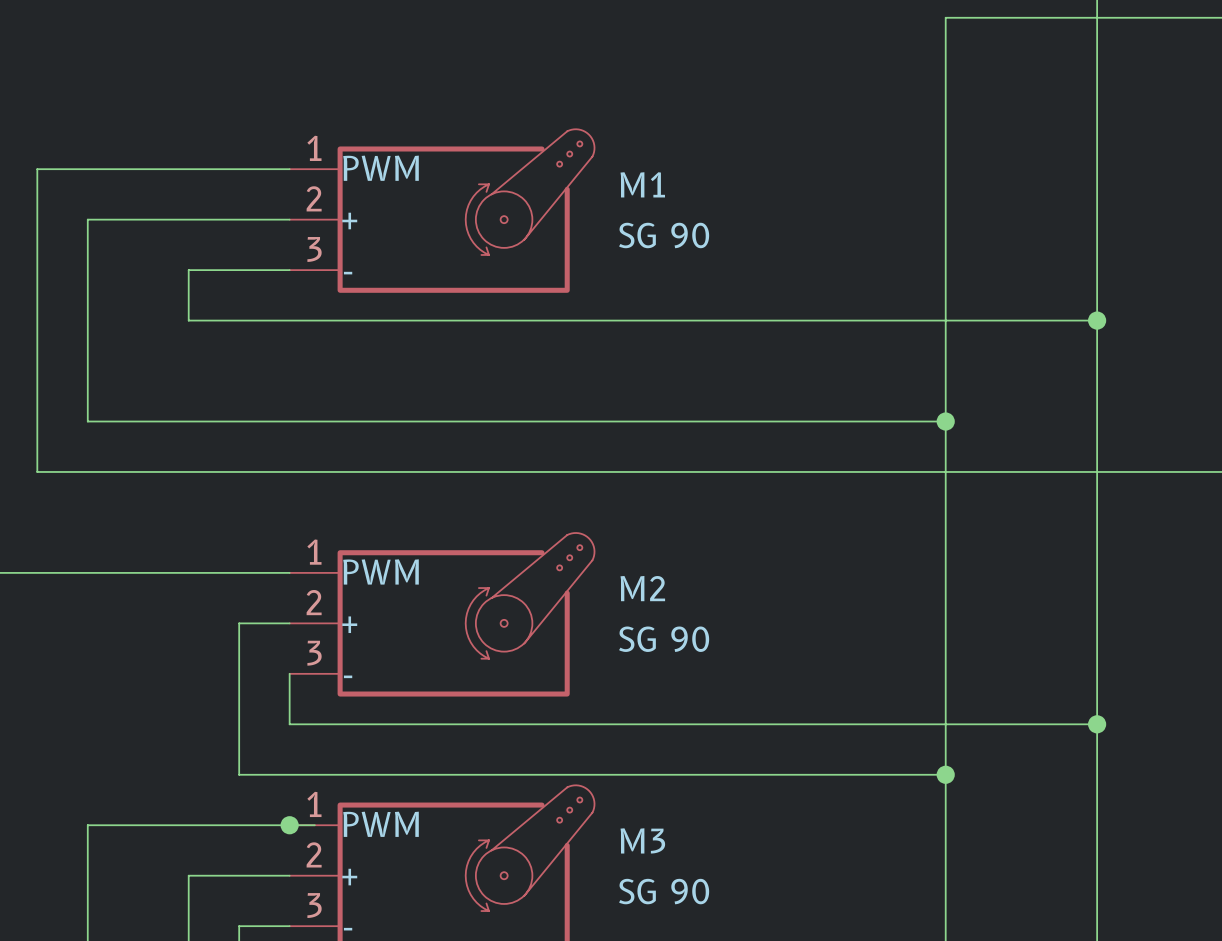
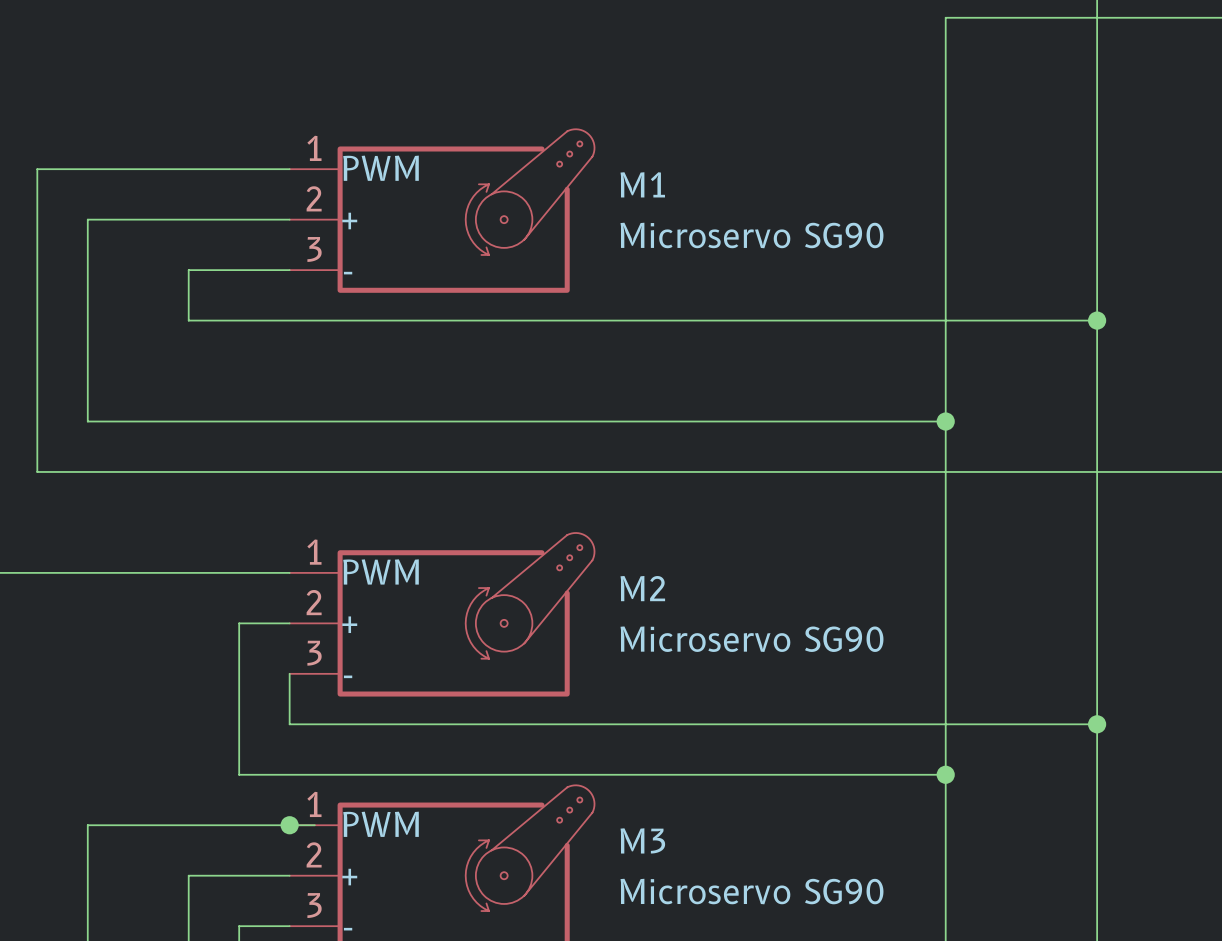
M1 value: SG 90 (664, 235) -> Microservo SG90 (751, 235)
M2 value: SG 90 (664, 639) -> Microservo SG90 (751, 639)
M3 value: SG 90 (664, 891) -> Microservo SG90 (751, 891)

